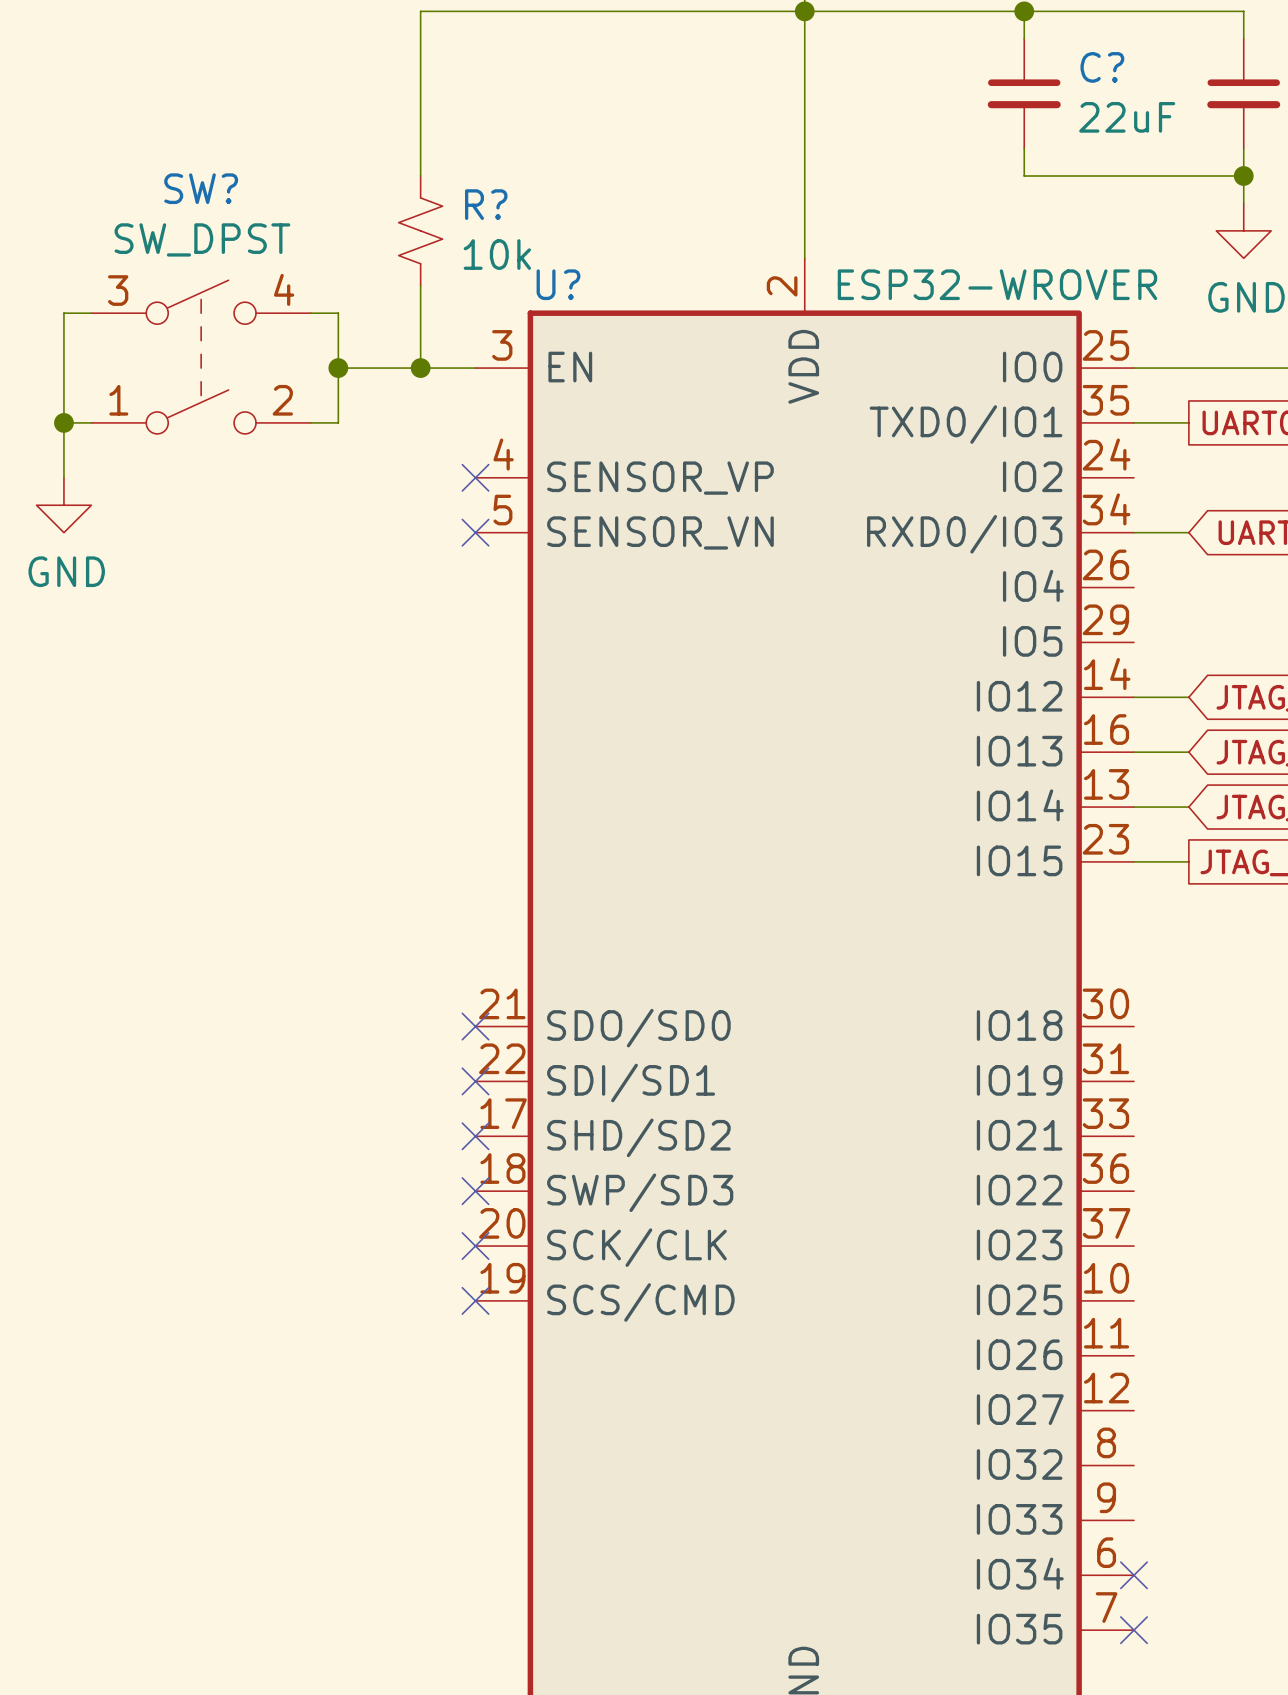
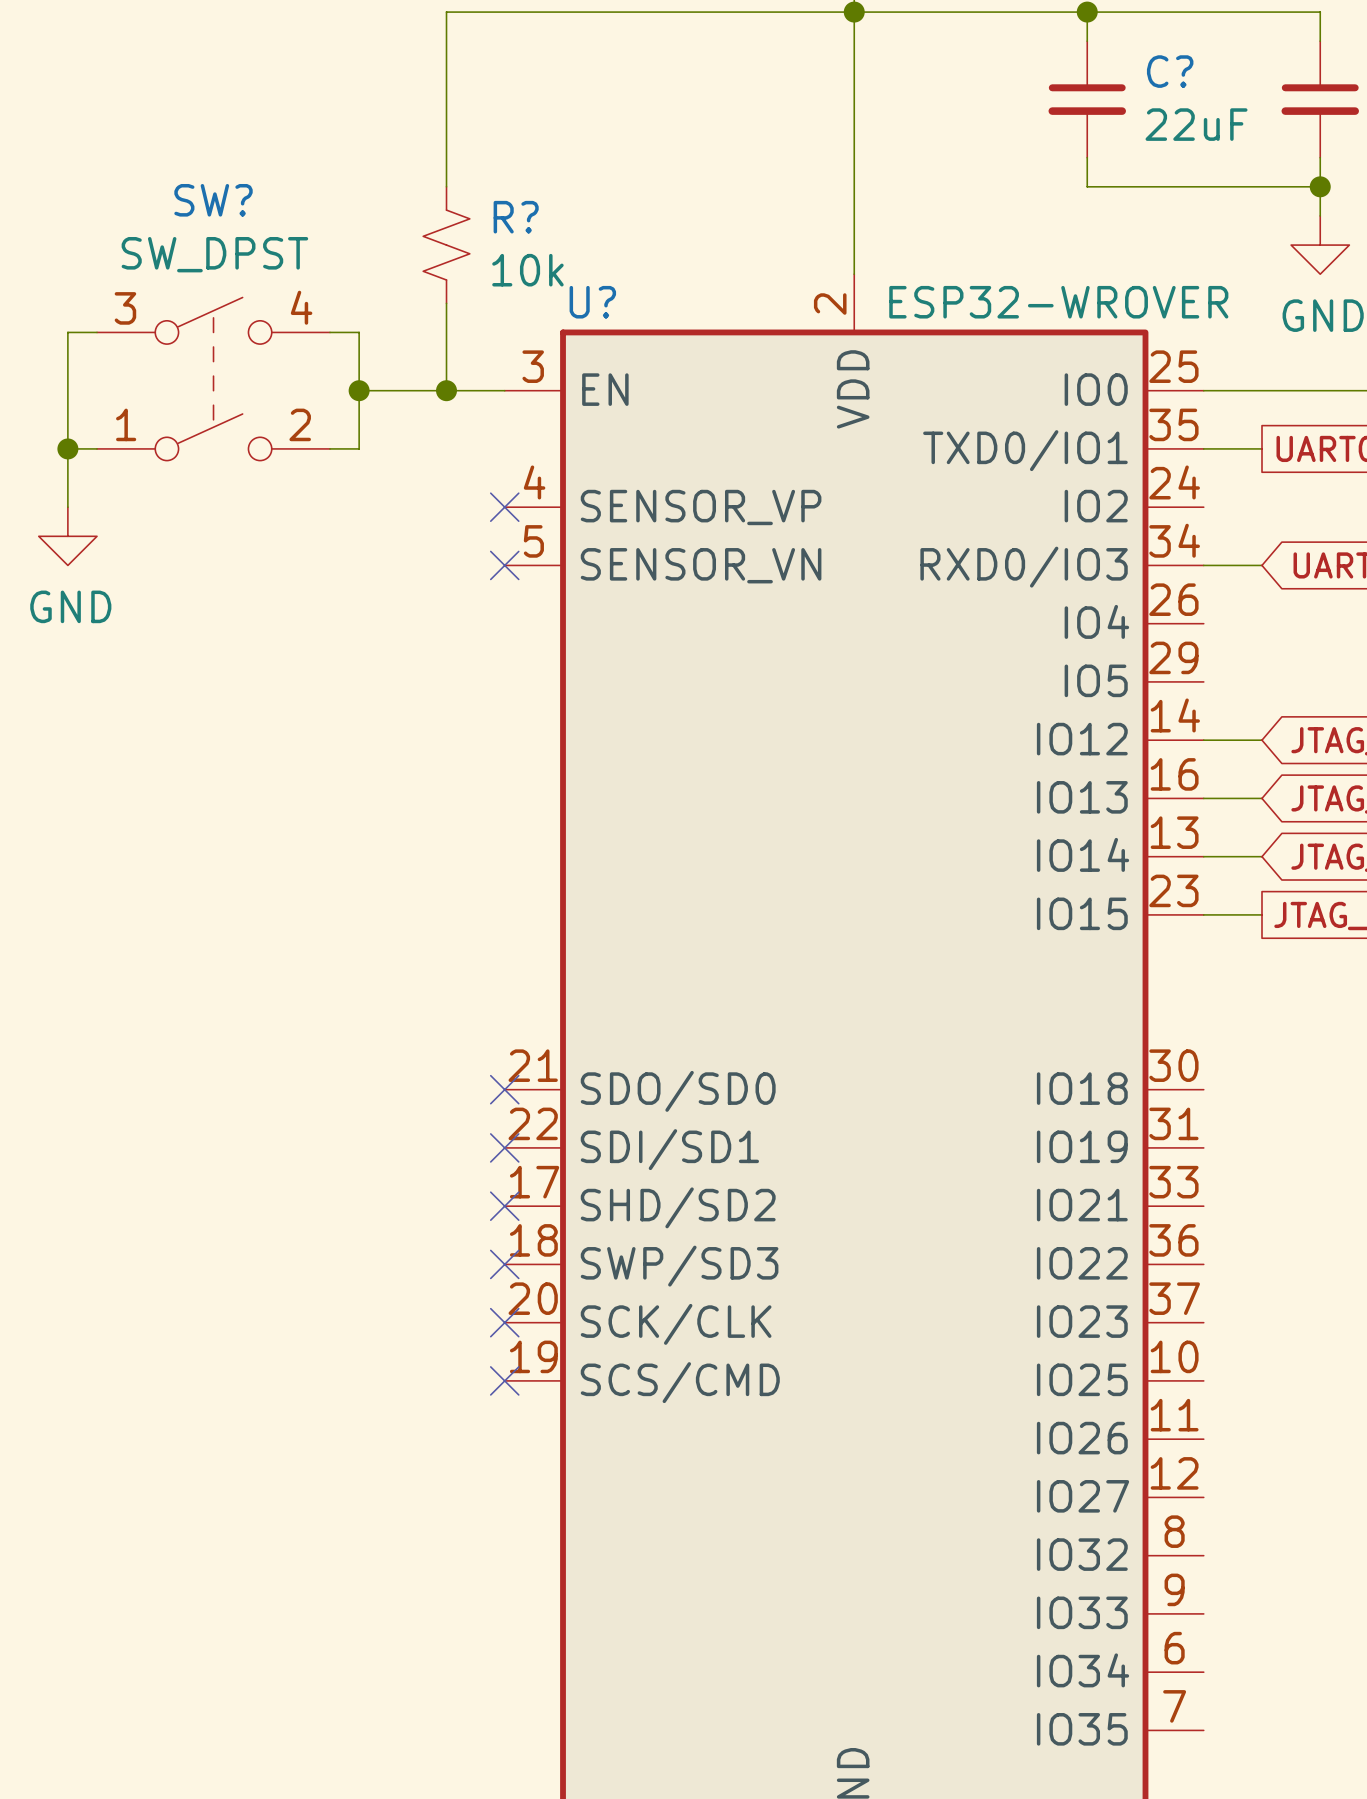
no-connect mark: (1133, 1575) -> none
no-connect mark: (1133, 1630) -> none

